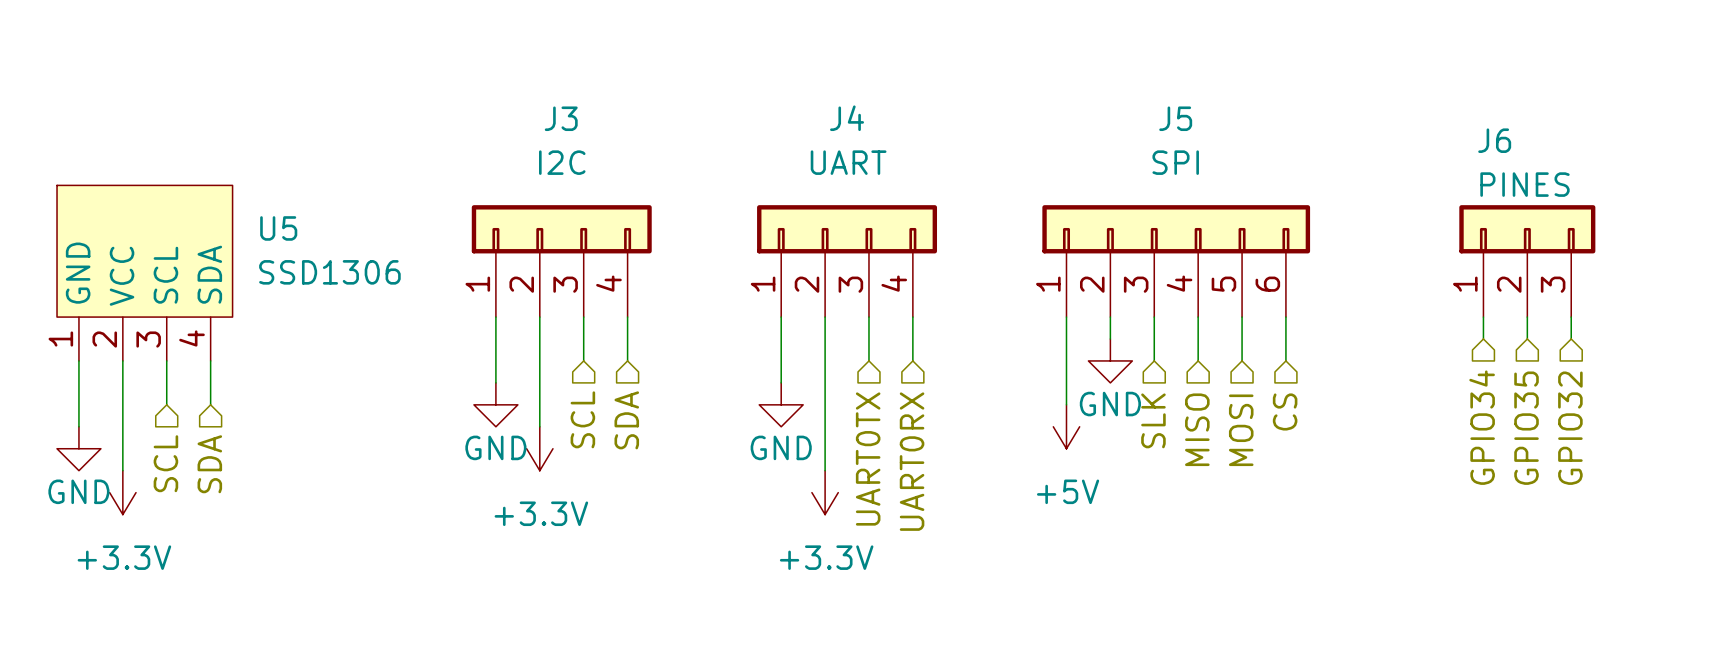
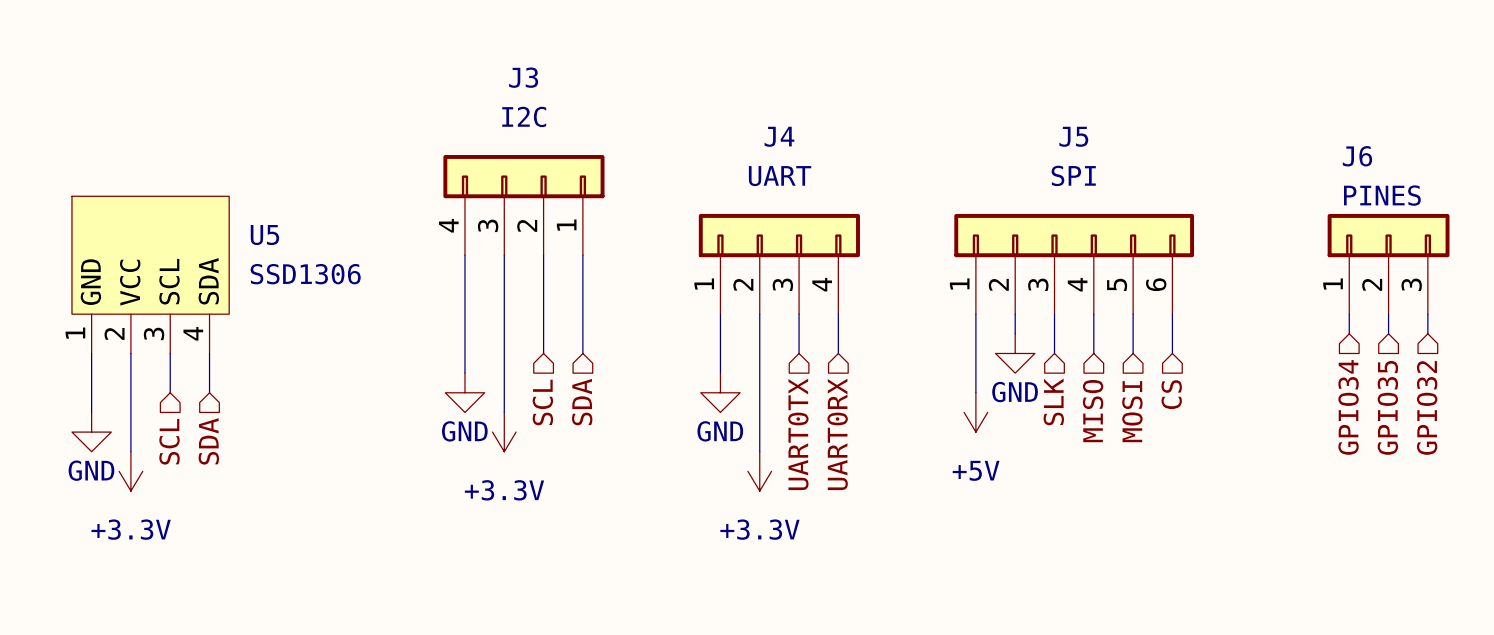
J3 flip: as is (561, 229) -> left-right (523, 176)

